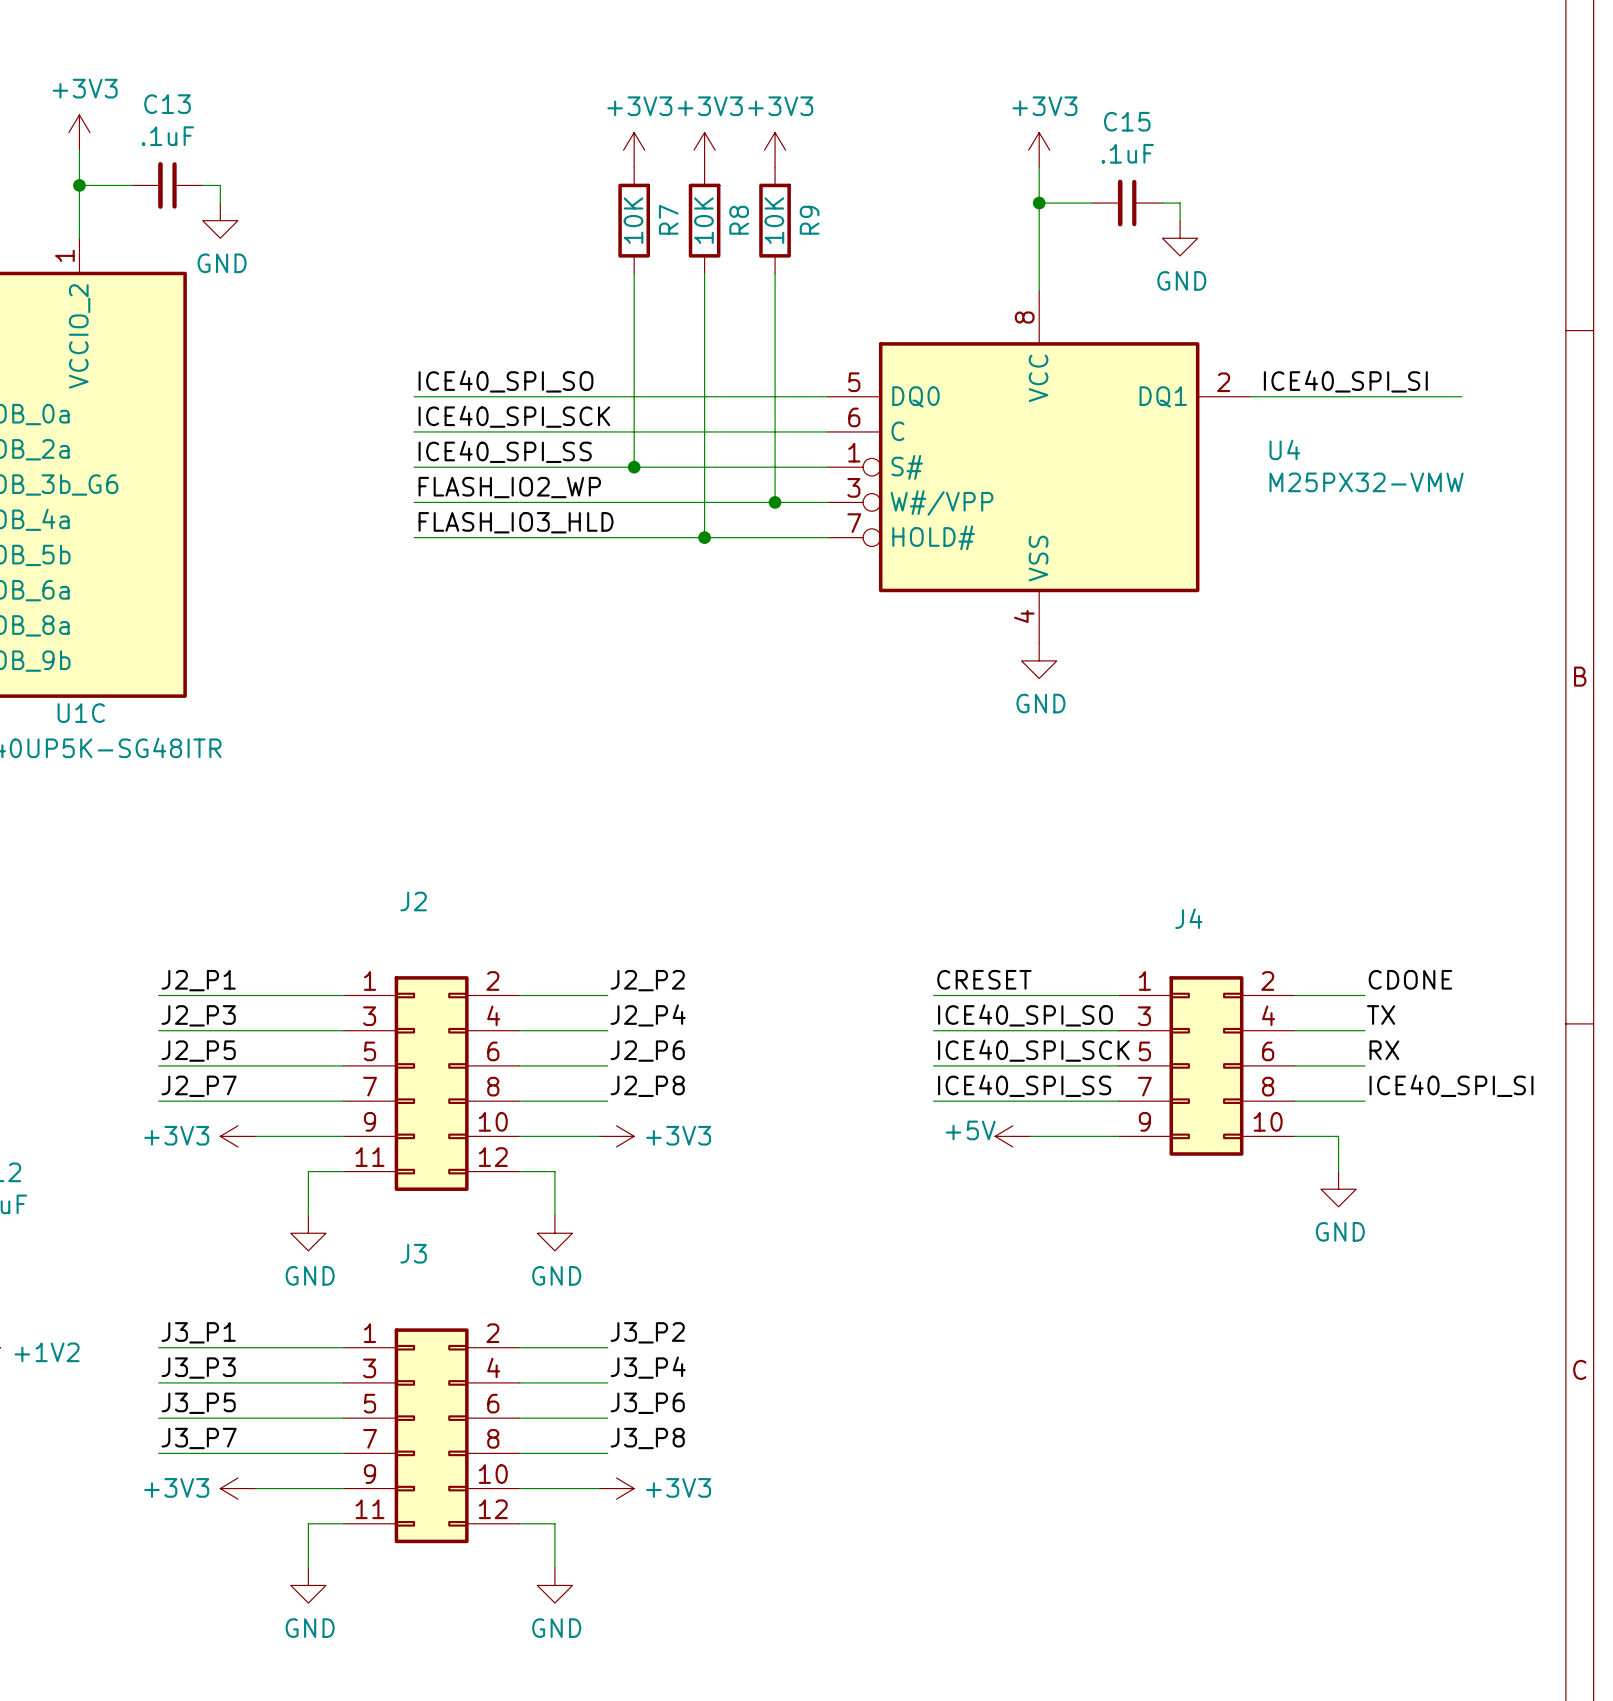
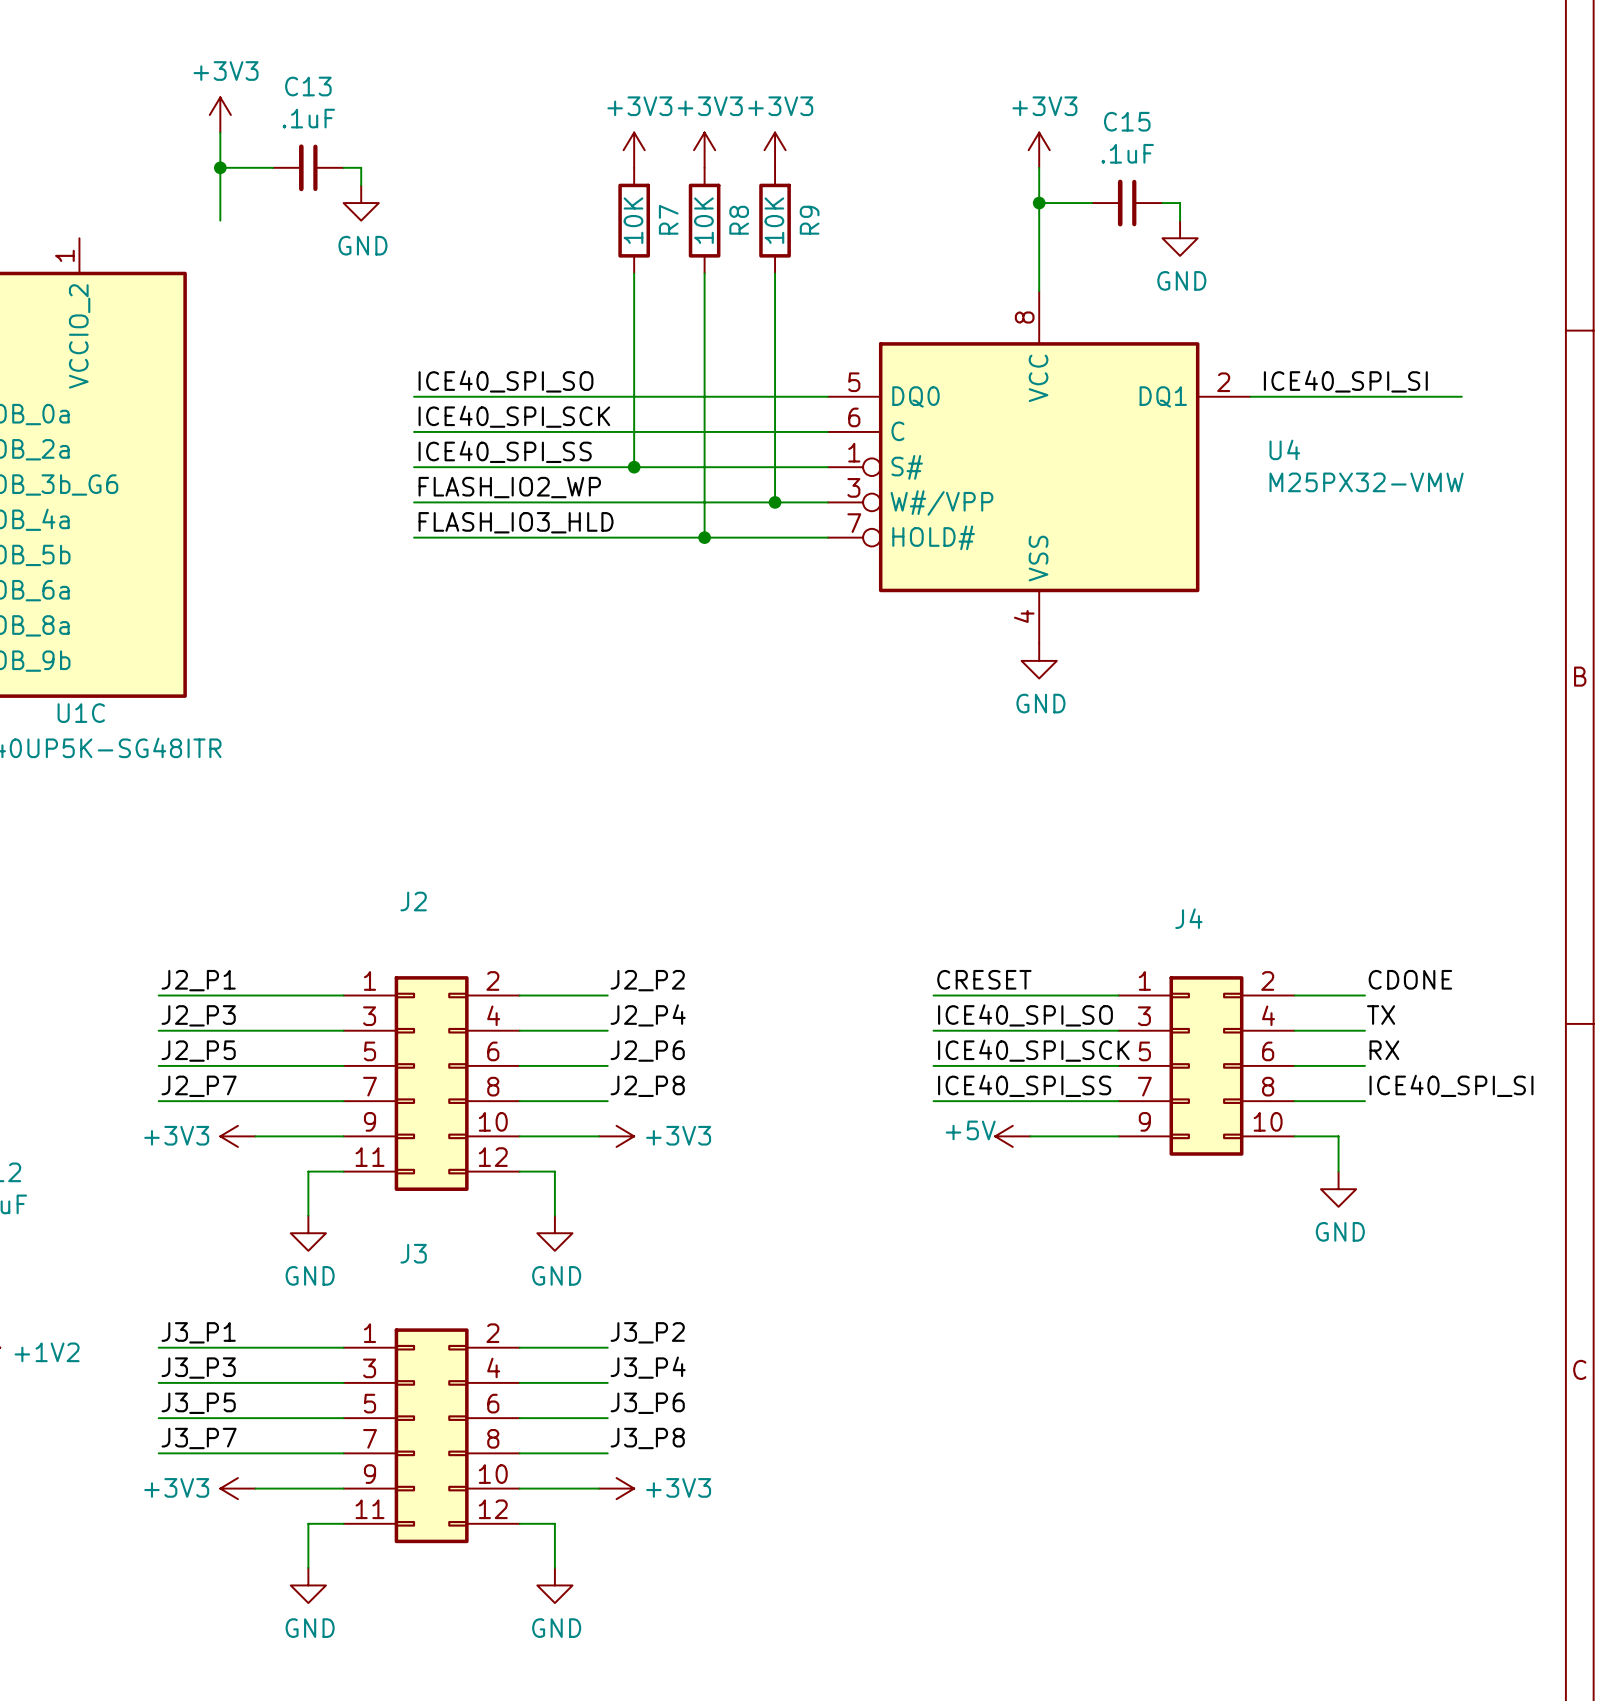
power symbol position: +3V3 (79, 132) -> +3V3 (220, 114)
wire: (79, 150) (79, 238) -> none
junction: none -> (220, 167)
wire: none -> (343, 167) (361, 167) (361, 185)
wire: (79, 185) (132, 185) -> (220, 167) (273, 167)
junction: (79, 185) -> none
C13 position: (167, 185) -> (308, 167)
wire: (202, 185) (220, 185) -> (220, 132) (220, 185)
power symbol position: GND (220, 220) -> GND (361, 203)

